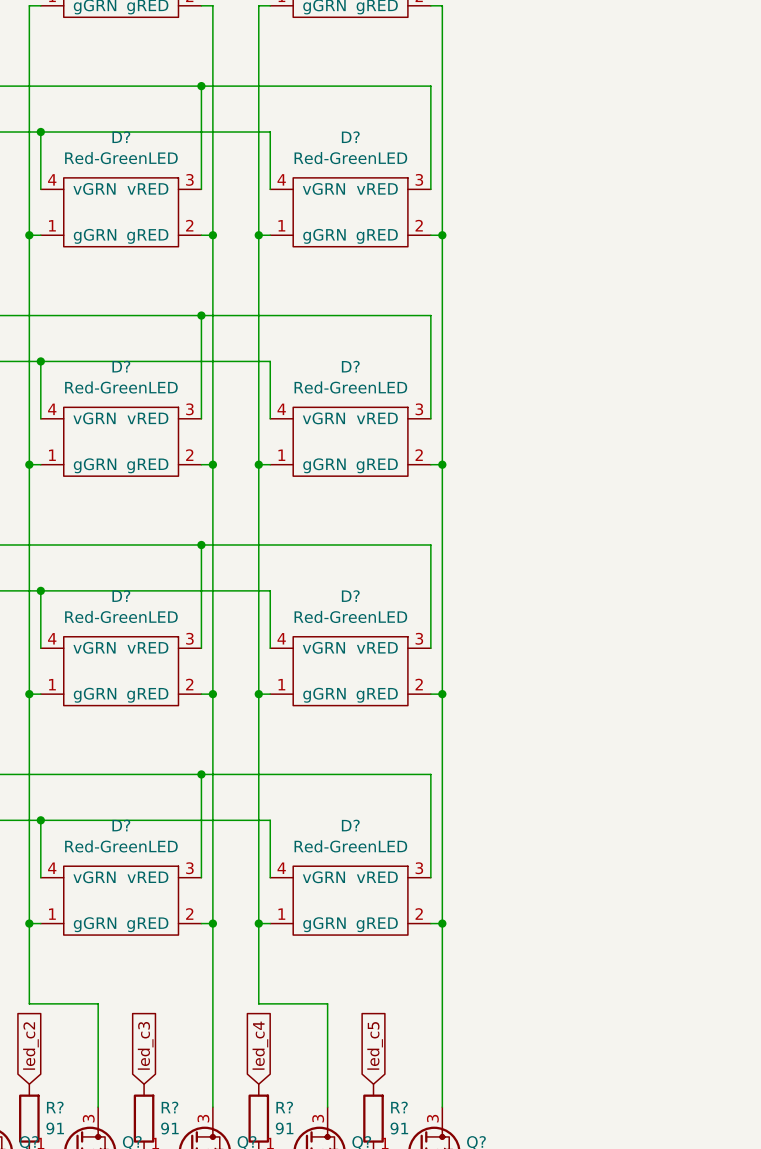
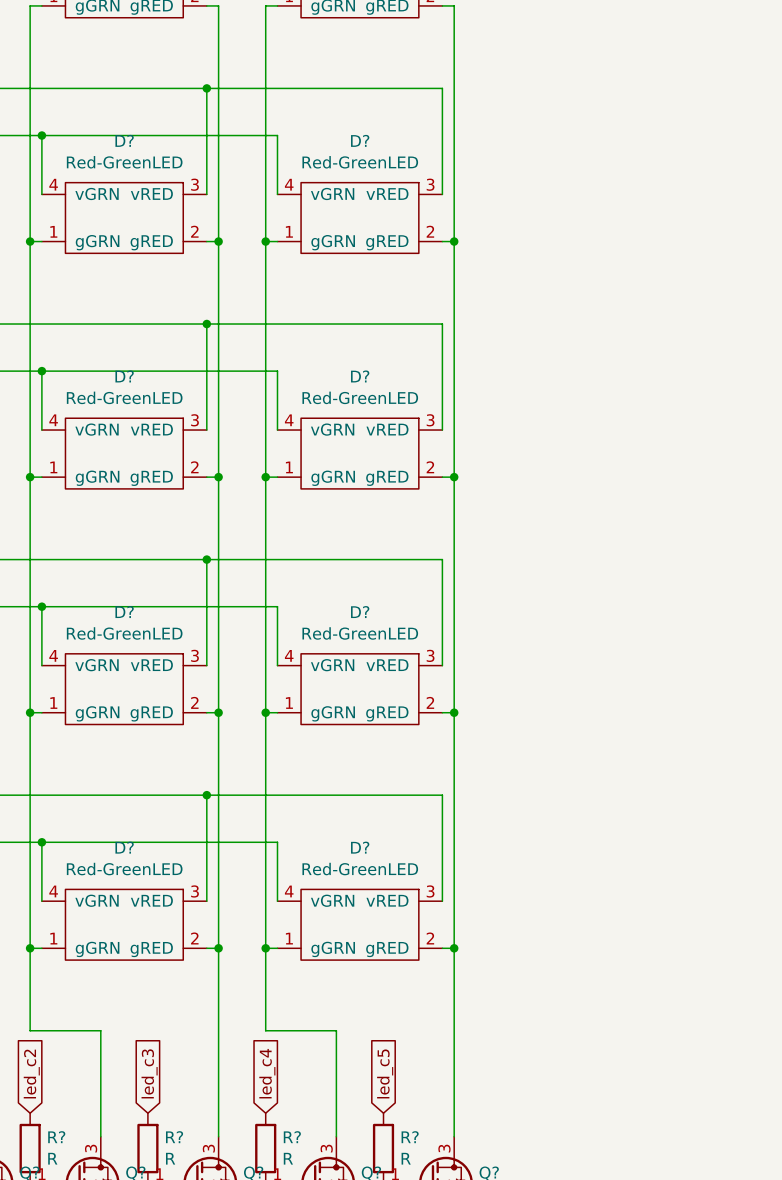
R? value: 91 (55, 1128) -> R (52, 1158)
R? value: 91 (169, 1128) -> R (170, 1158)
R? value: 91 (284, 1128) -> R (288, 1158)
R? value: 91 (399, 1128) -> R (406, 1158)

